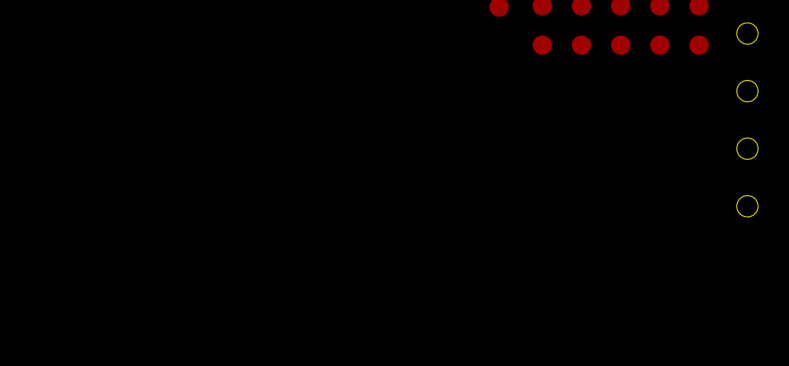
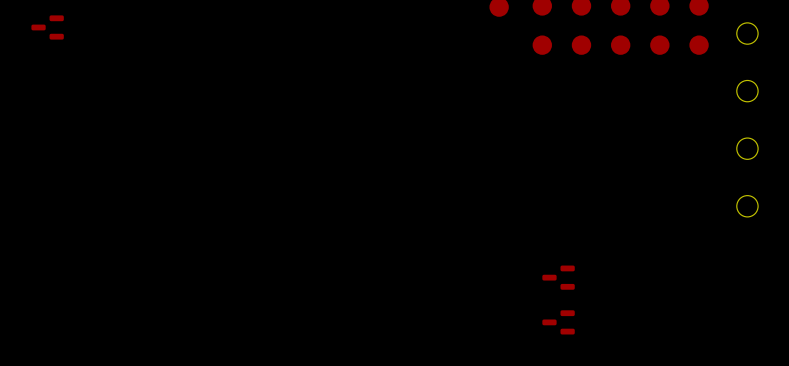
part: none -> (47, 27)
part: none -> (558, 277)
part: none -> (558, 322)

